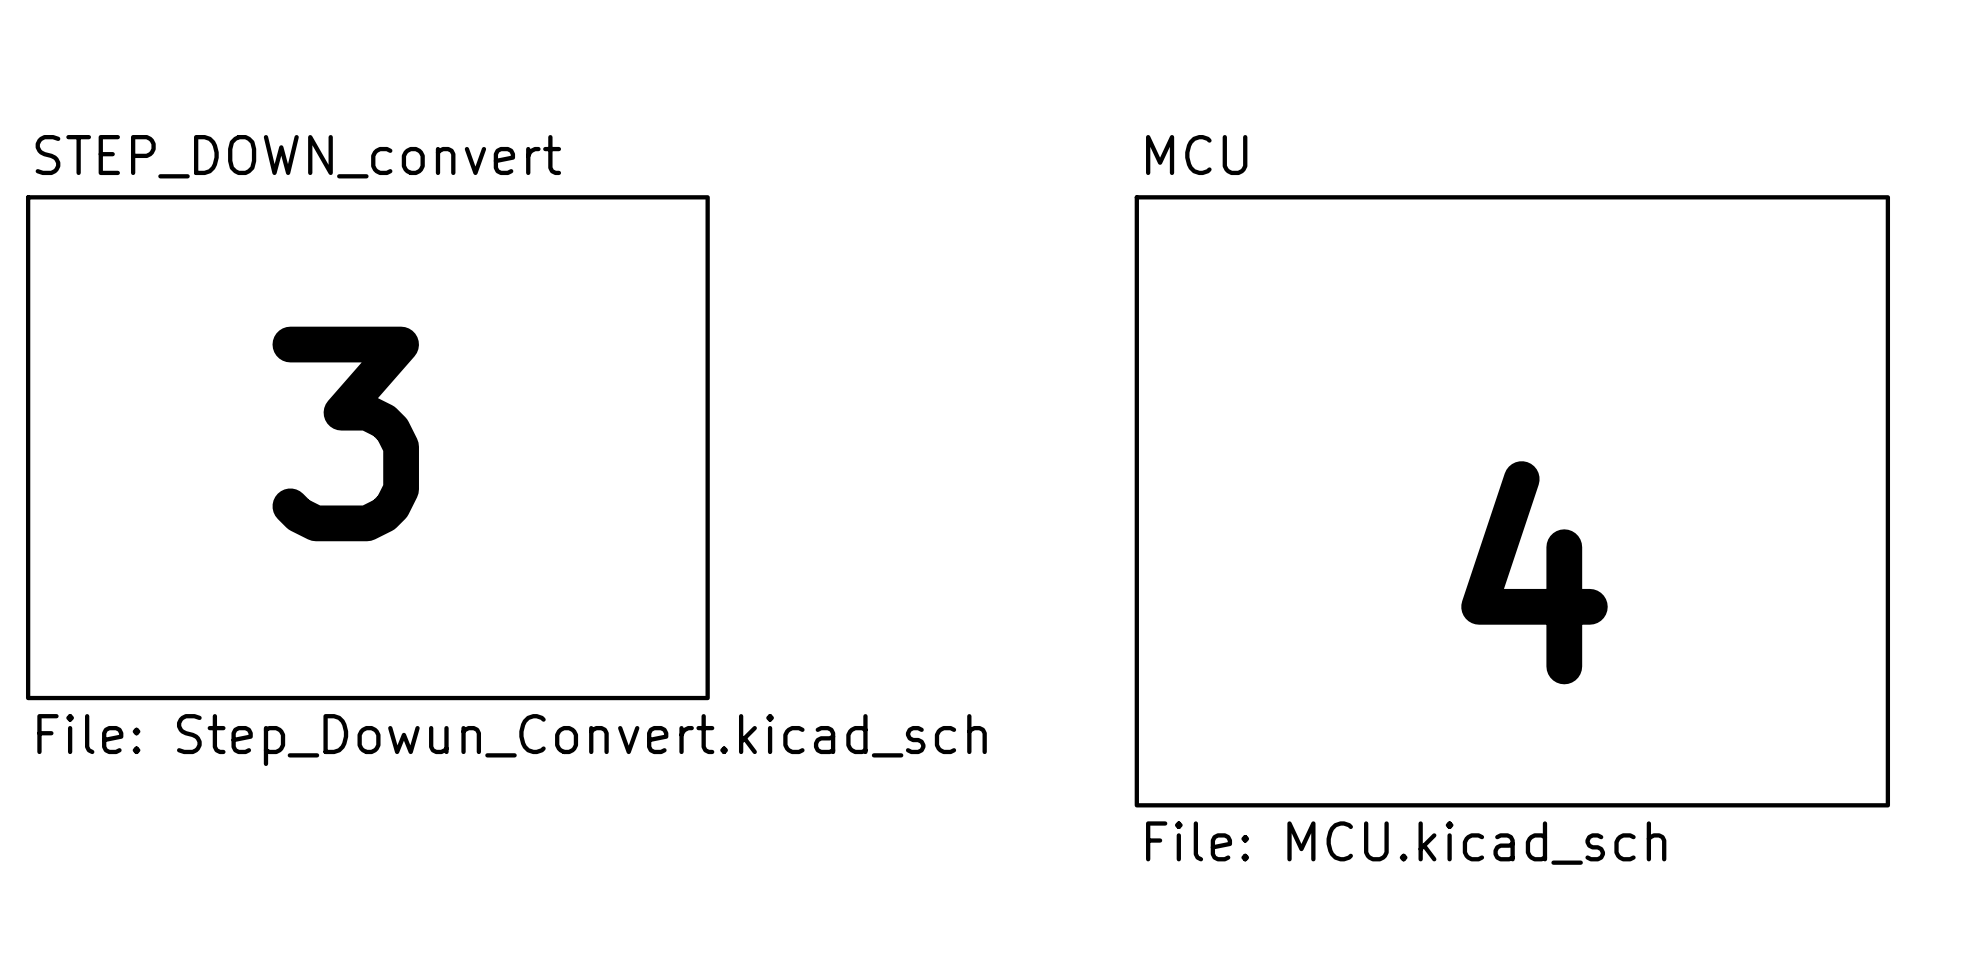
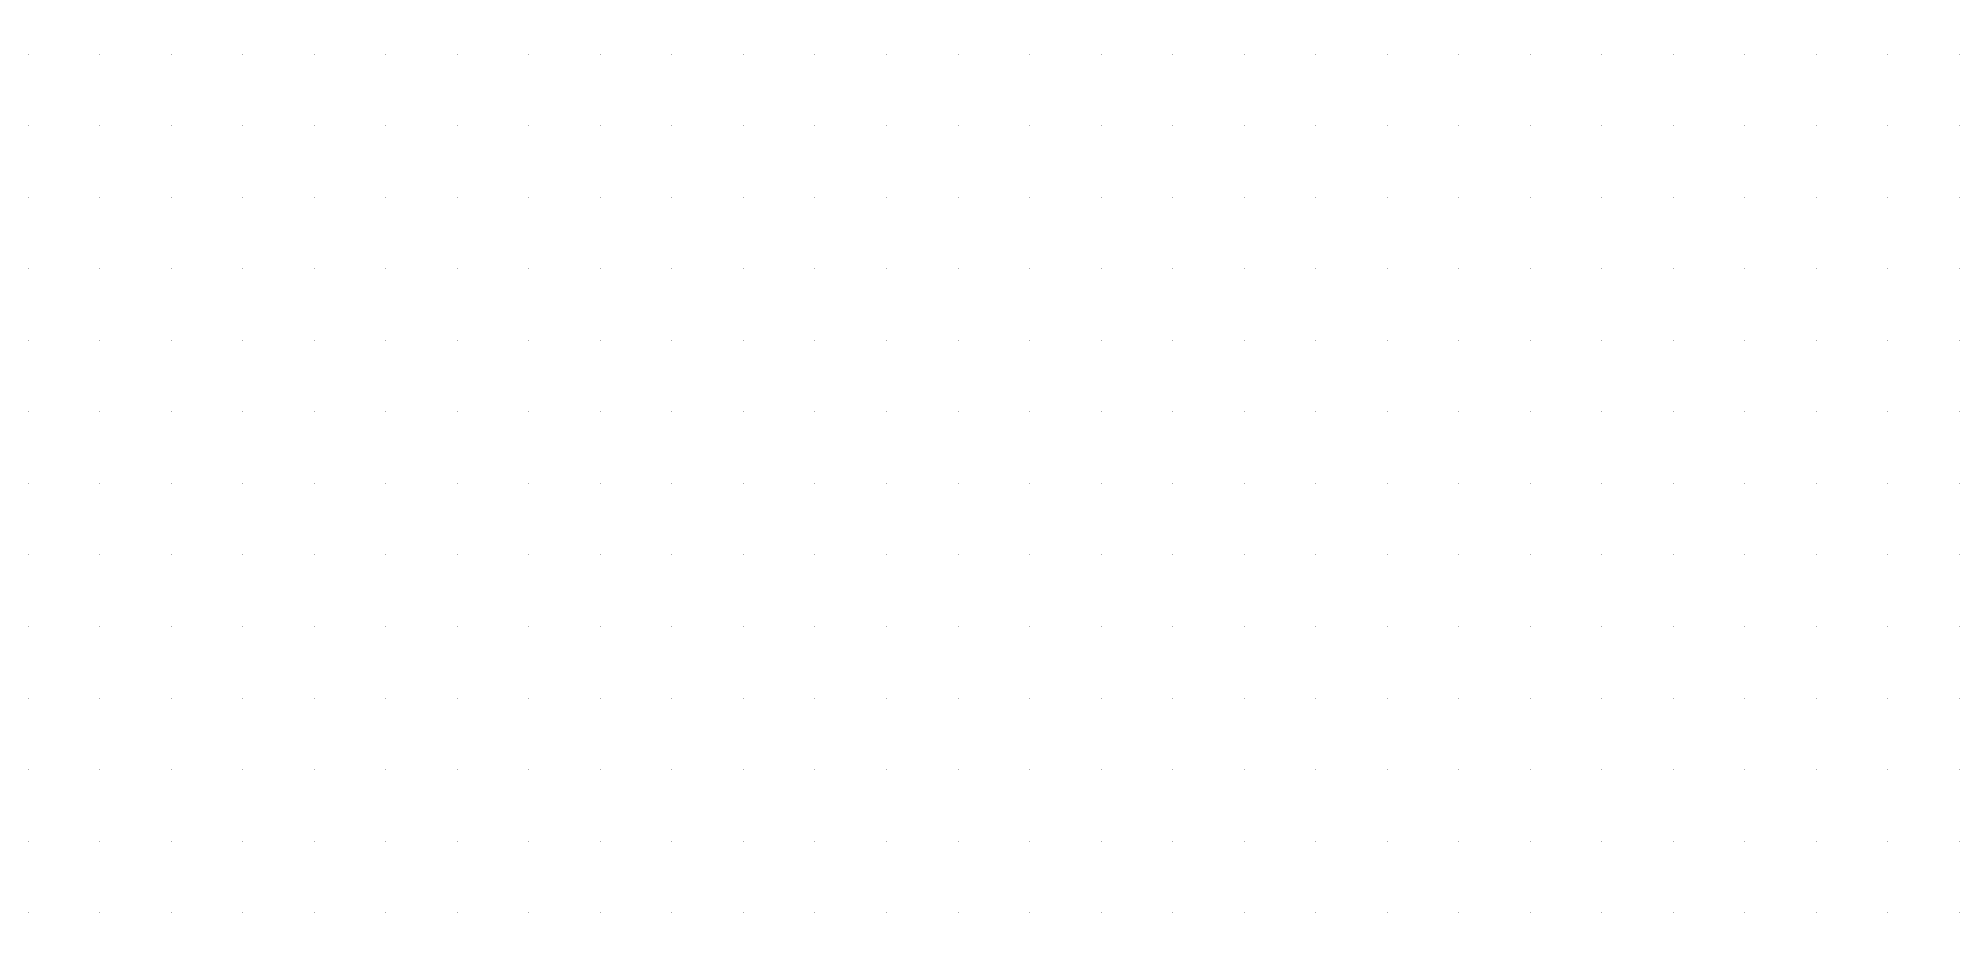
text: 3 (345, 433) -> none
sheet STEP_DOWN_convert: File: Step_Dowun_Convert.kicad_sch (367, 447) -> none
sheet MCU: File: MCU.kicad_sch (1512, 501) -> none
text: 4 (1534, 572) -> none

